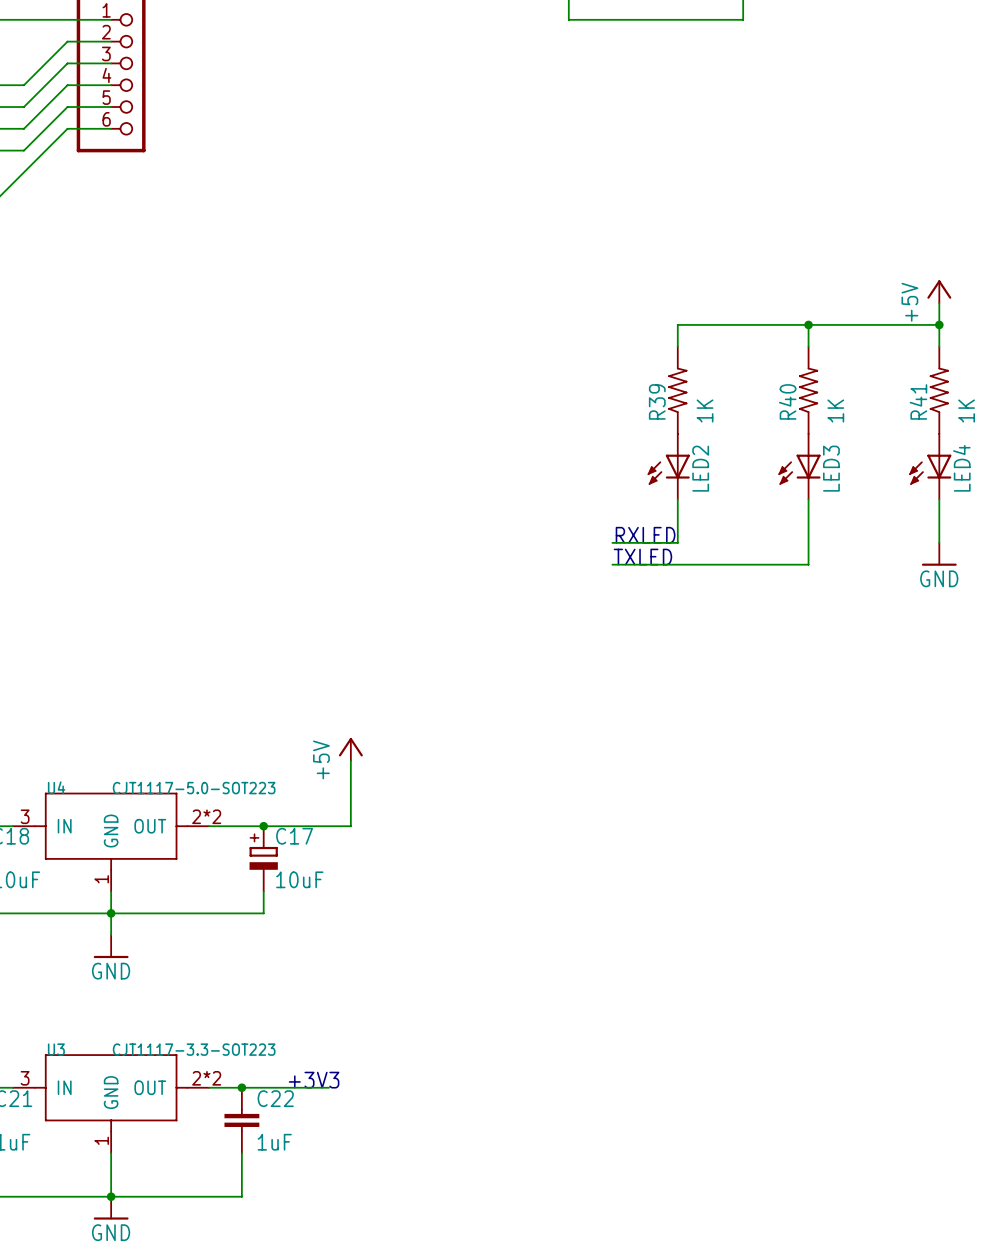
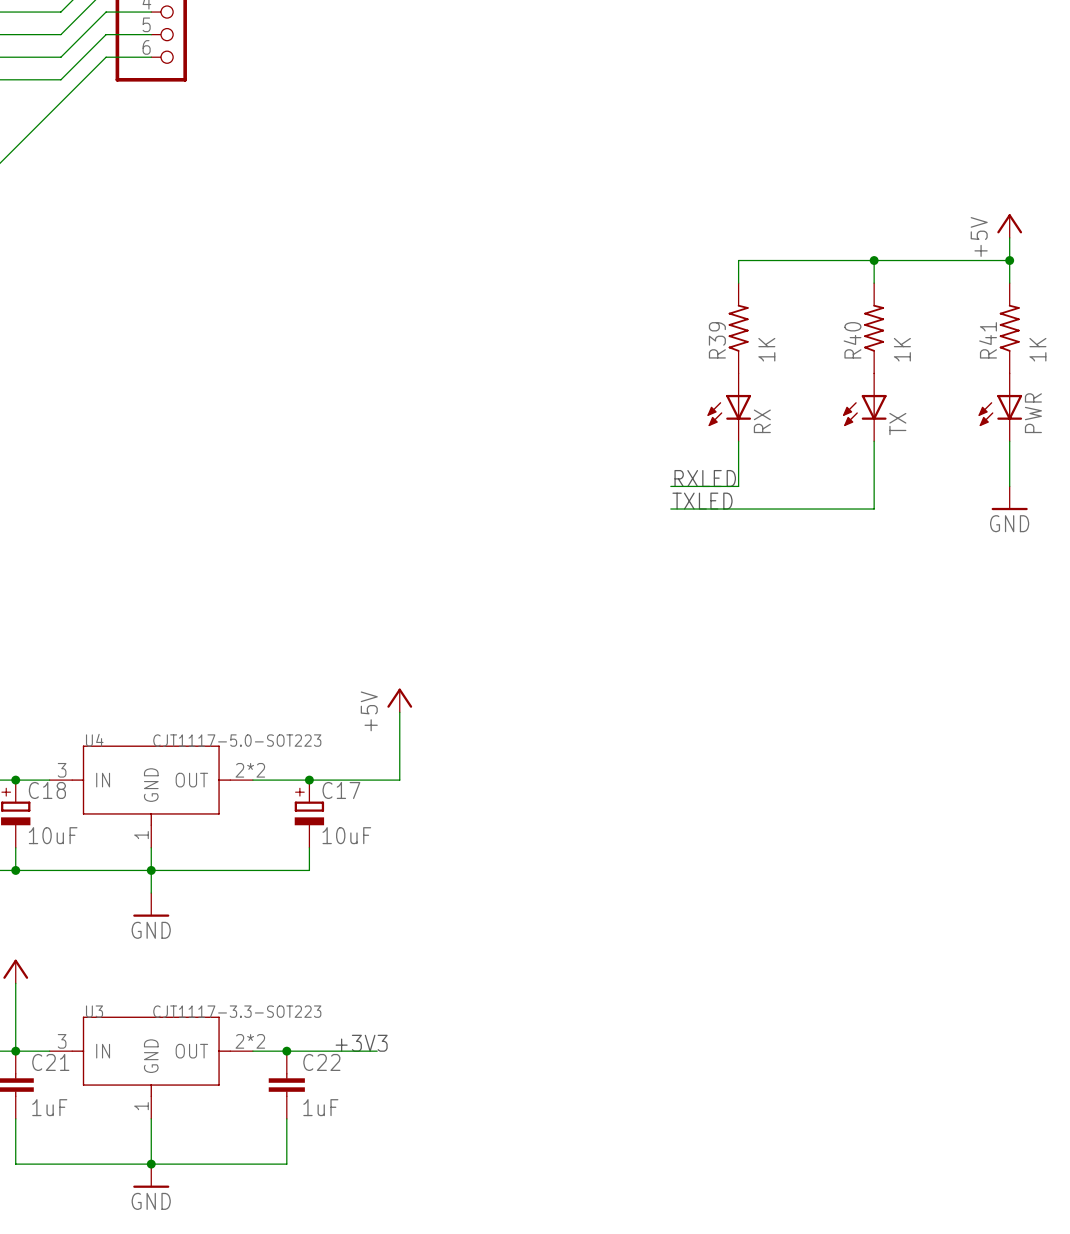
LED2 name: LED2 (700, 468) -> RX (762, 421)
LED3 name: LED3 (831, 468) -> TX (897, 424)
LED4 name: LED4 (961, 468) -> PWR (1033, 413)

